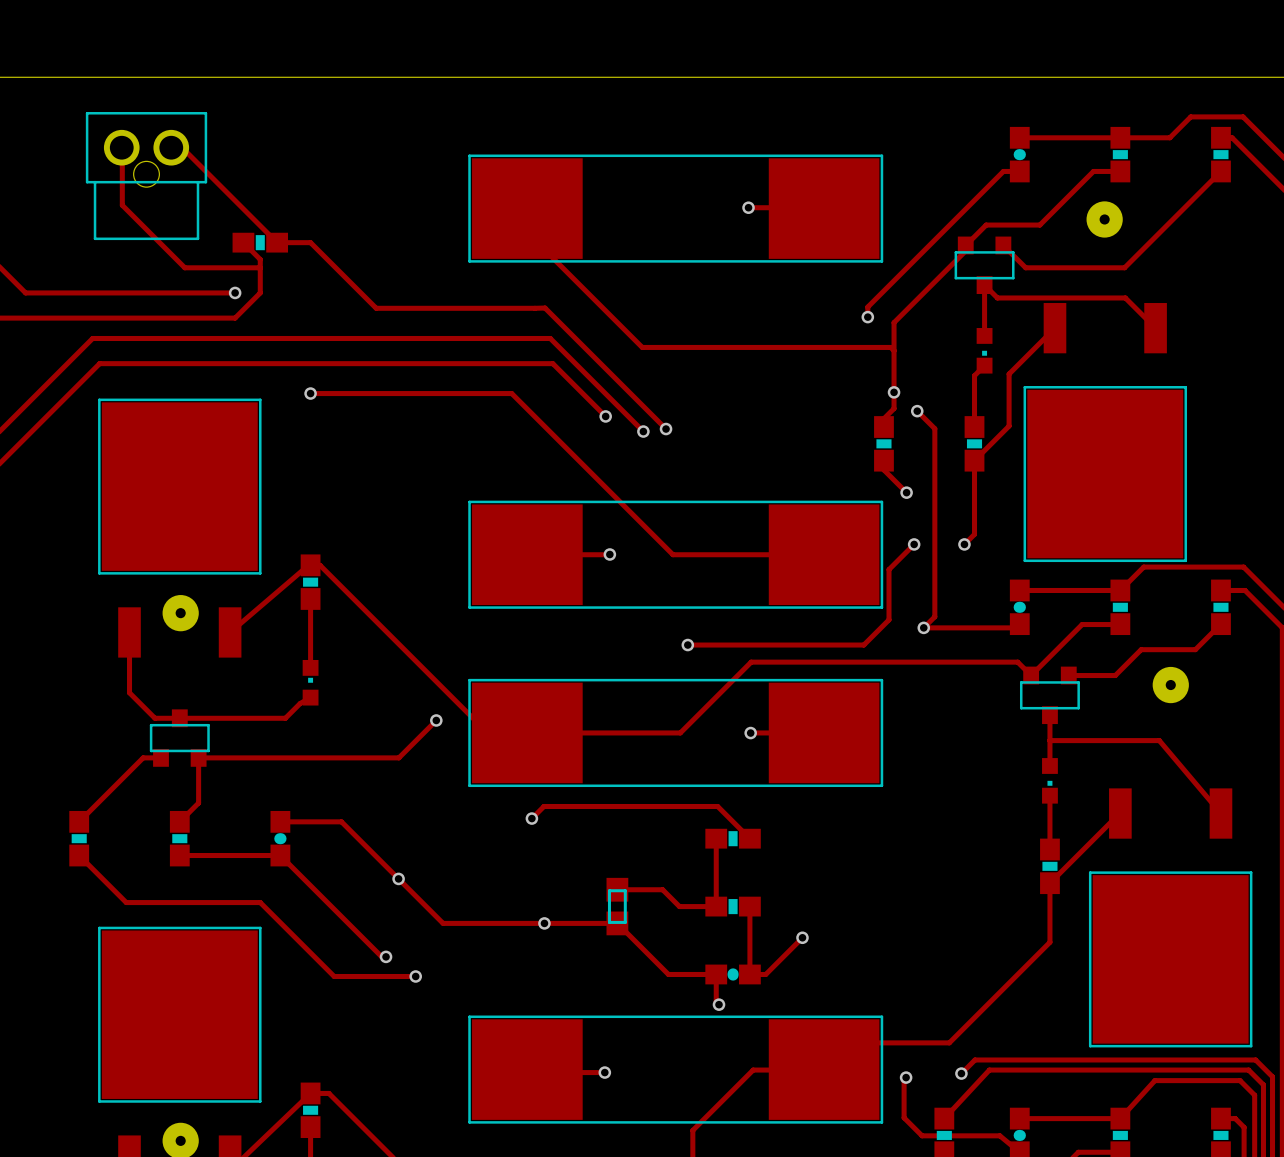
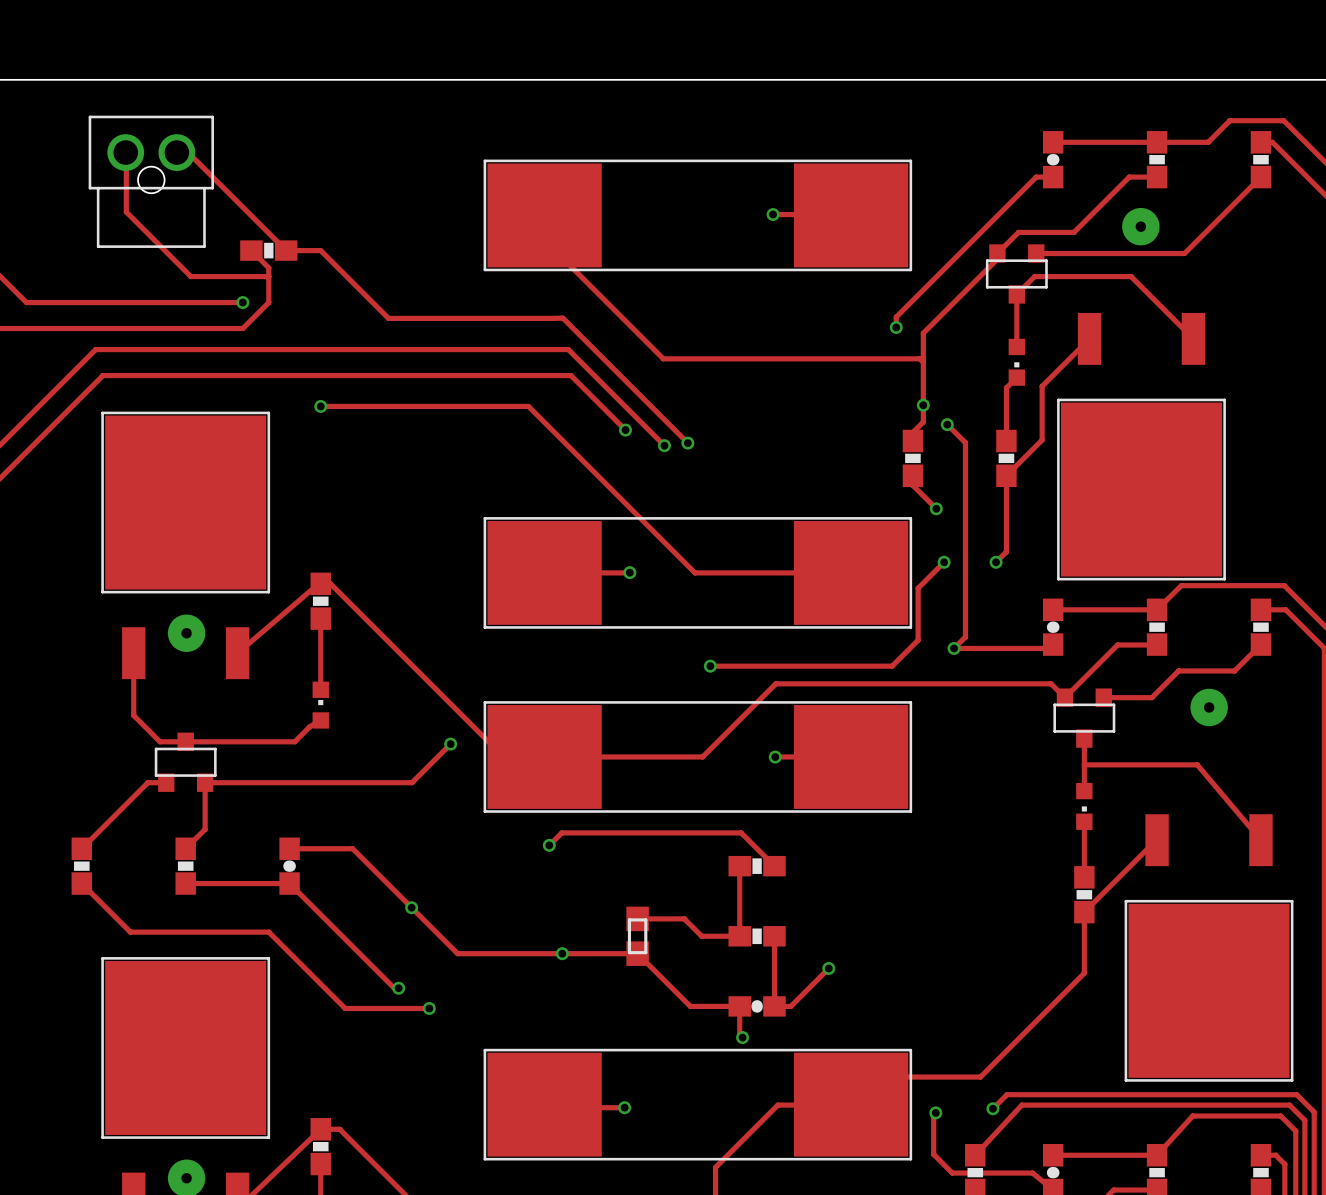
track: (1003, 245) (1025, 267) -> (1016, 294) (1034, 276) (1059, 276)
track: none -> (1036, 253) (1184, 253)
track: (1146, 245) (1124, 267) (1095, 267) -> (1162, 307) (1131, 276)
track: (984, 285) (997, 297) (1125, 297) -> none

